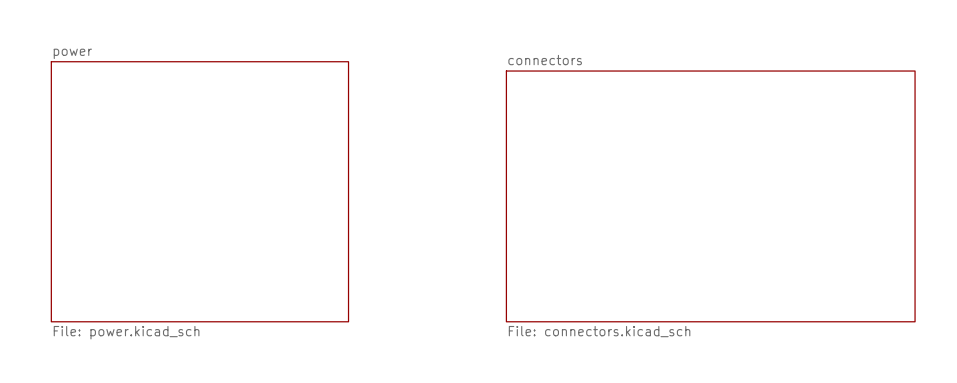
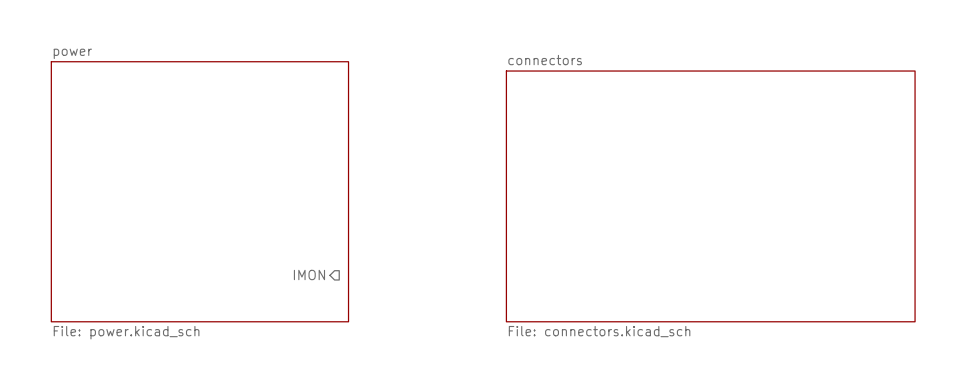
sheet pin: none -> IMON (309, 274)

